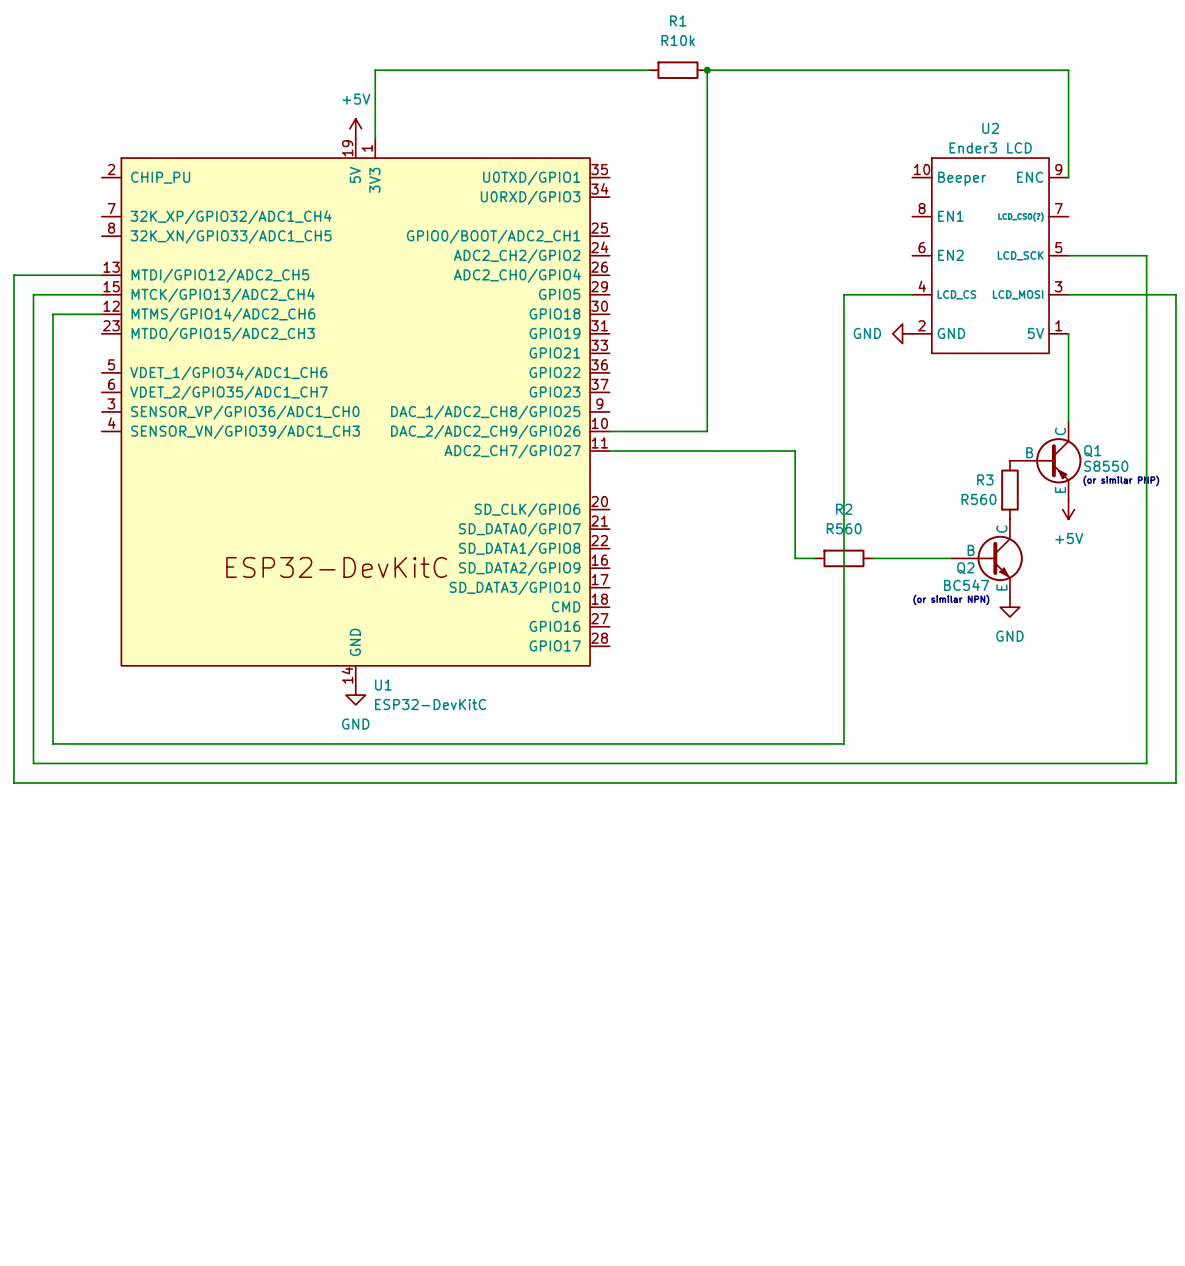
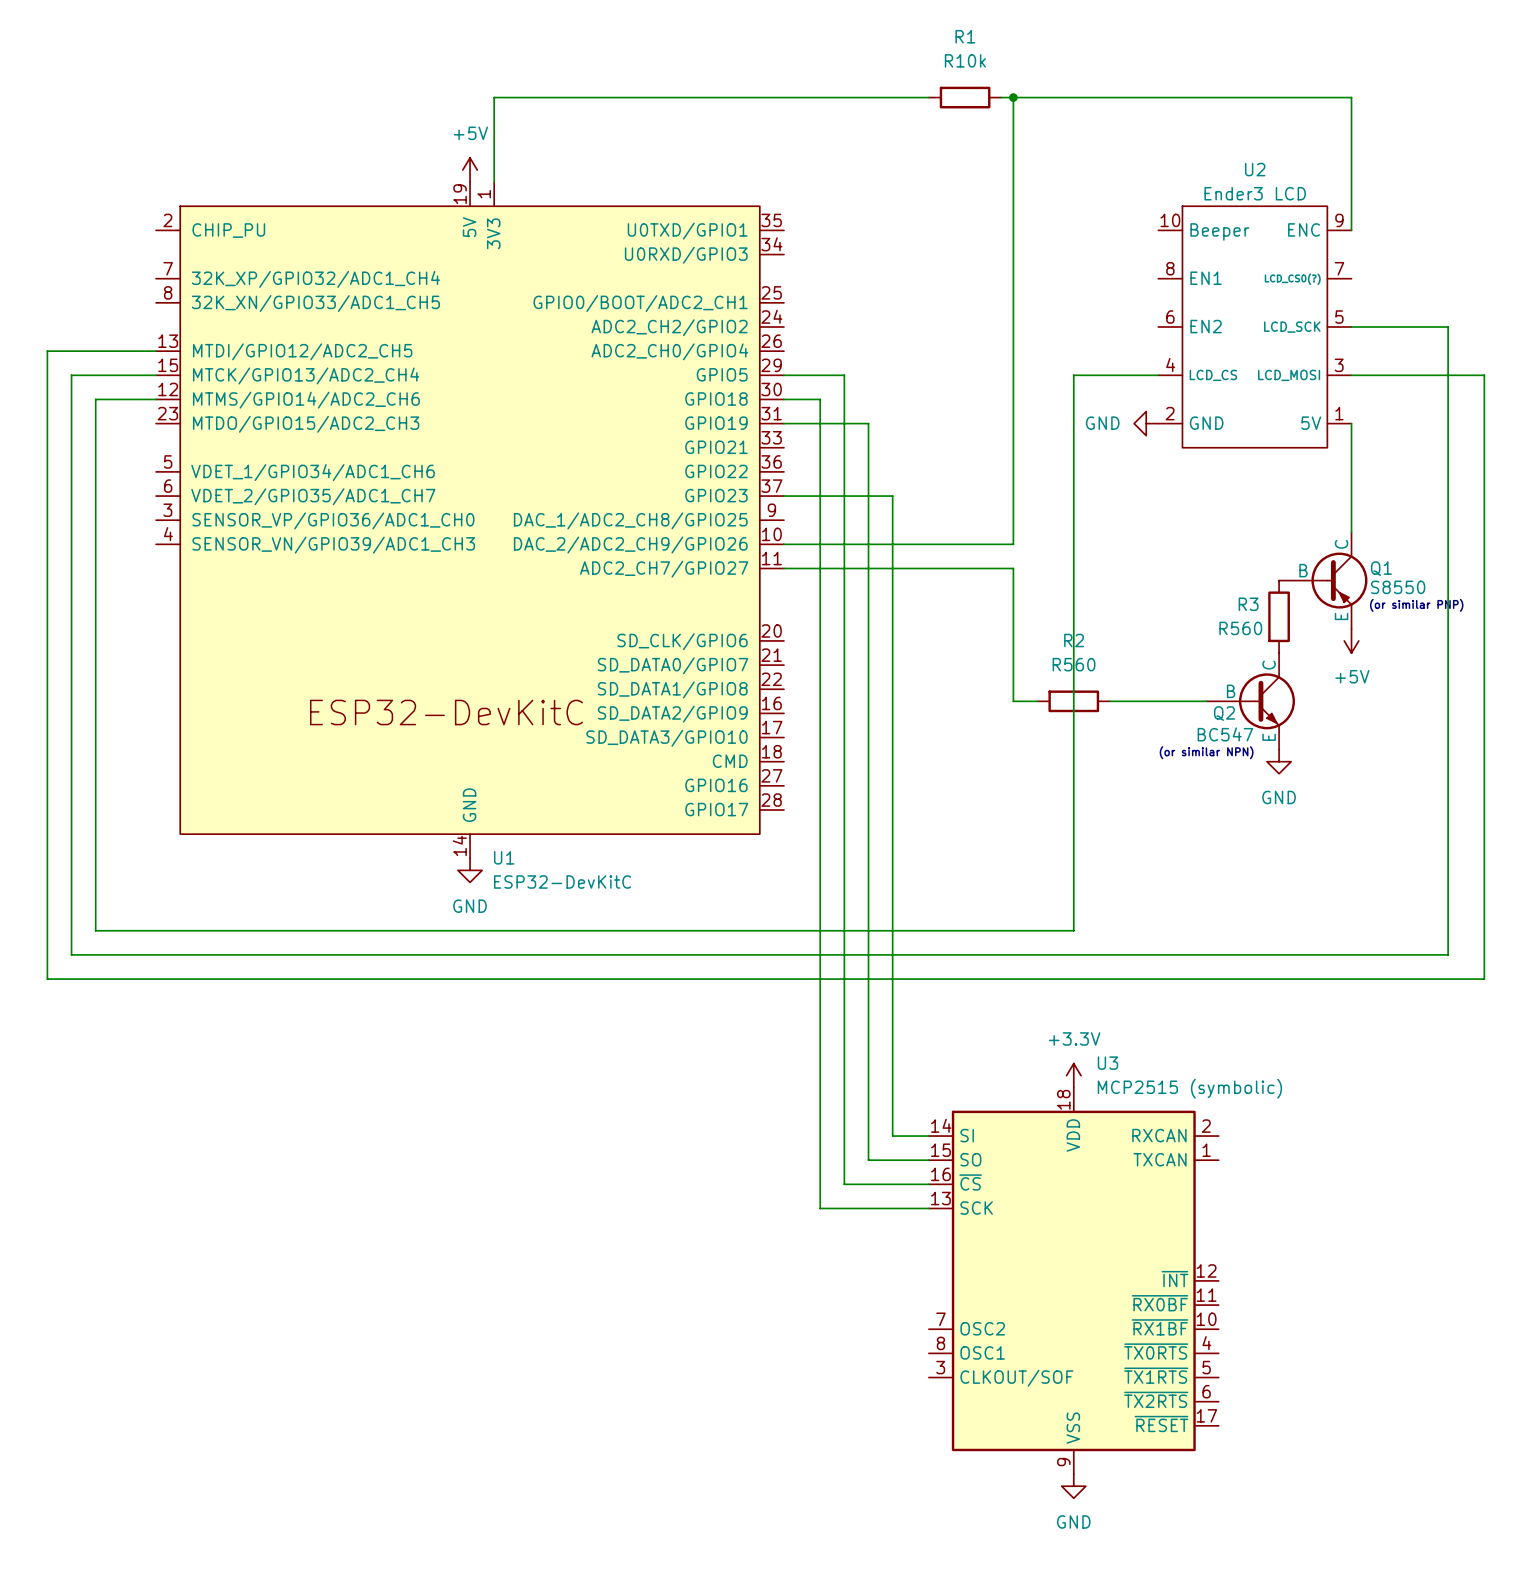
R1 position: (677, 70) -> (965, 97)
wire: (707, 70) (707, 431) -> (1013, 97) (1013, 544) (904, 544)
junction: (707, 70) -> none
wire: (726, 70) (785, 70) -> (832, 97) (904, 97)
junction: none -> (1013, 97)
wire: none -> (783, 375) (844, 375) (844, 1184) (928, 1184)
wire: none -> (783, 399) (820, 399) (820, 1208) (928, 1208)
wire: none -> (783, 423) (868, 423) (868, 1160) (928, 1160)
wire: none -> (783, 496) (892, 496) (892, 1136) (928, 1136)
power symbol: none -> +3.3V (1073, 1075)
U3: none -> MCP2515 (symbolic) (1073, 1280)
power symbol: none -> GND (1073, 1486)

